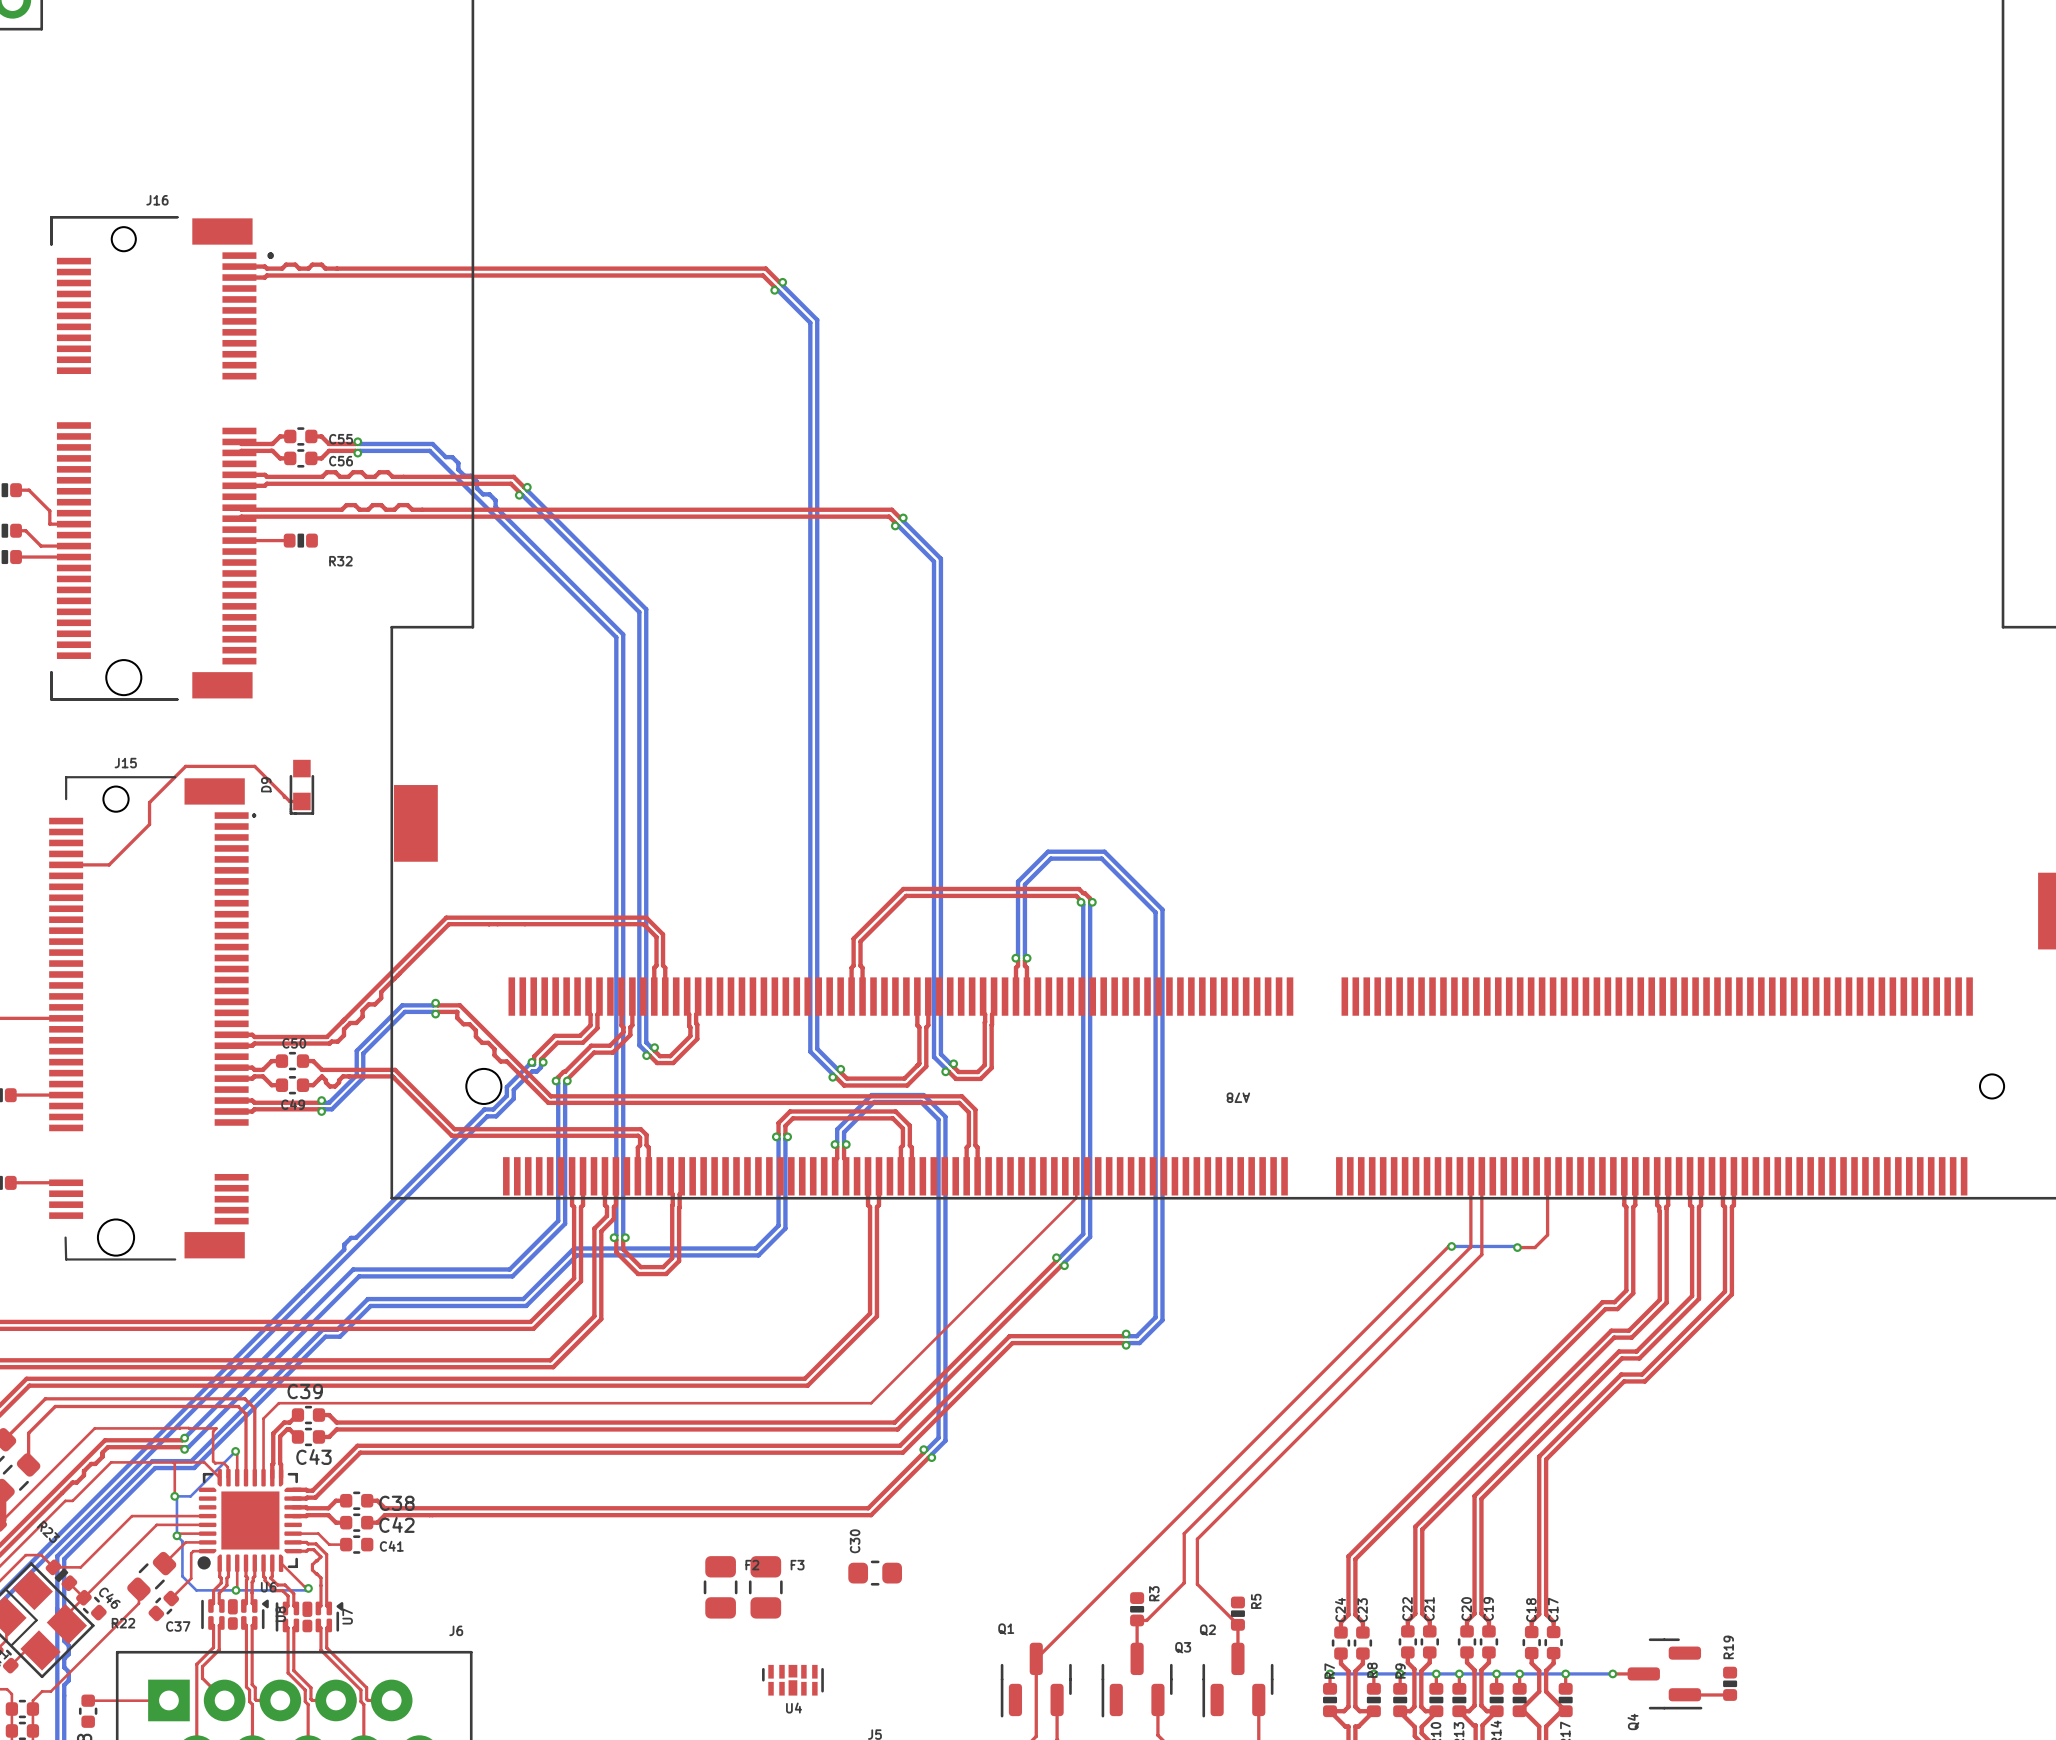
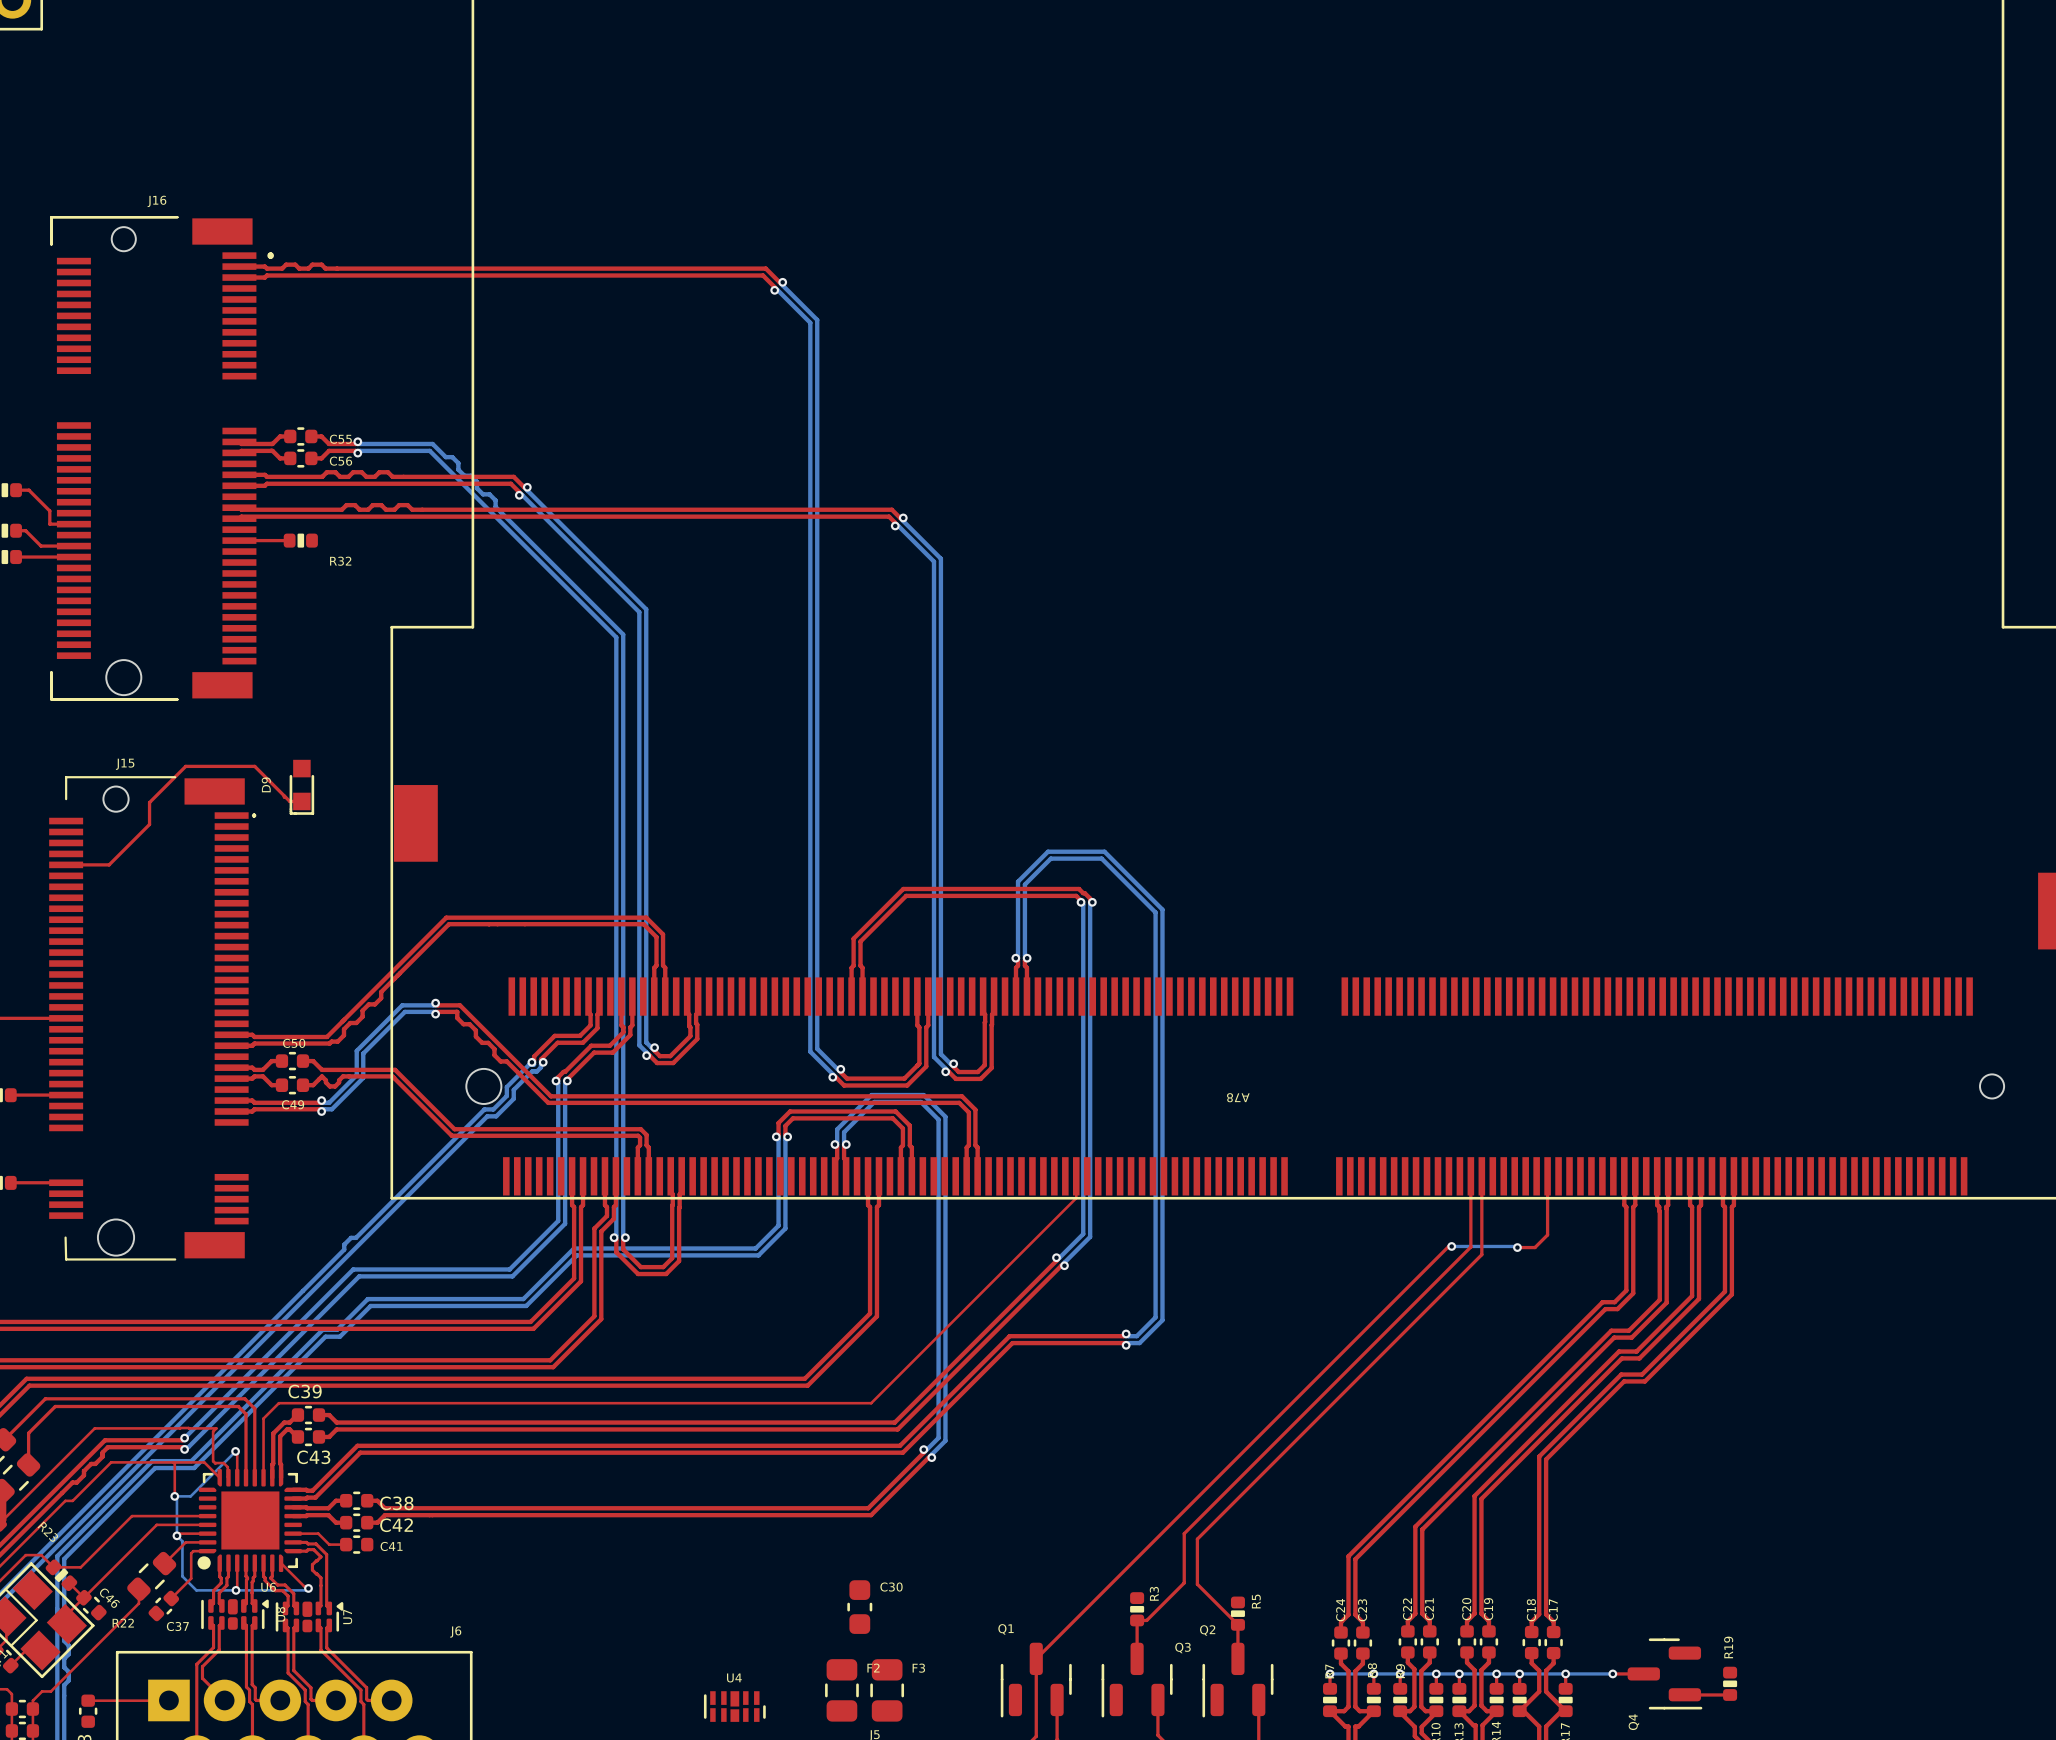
C30 rotation: 0° (875, 1573) -> 90° clockwise (859, 1607)
C30 position: (875, 1573) -> (859, 1607)
F2 position: (720, 1587) -> (841, 1690)
F3 position: (765, 1587) -> (887, 1690)
U4 rotation: 0° (792, 1680) -> 180° (734, 1706)
U4 position: (792, 1680) -> (734, 1706)

